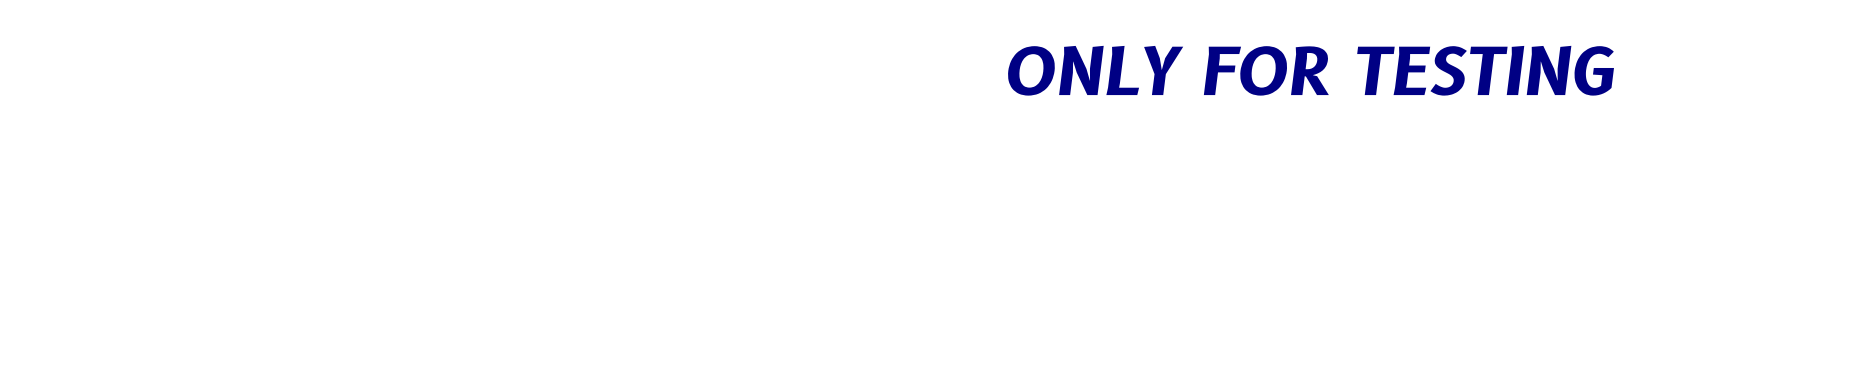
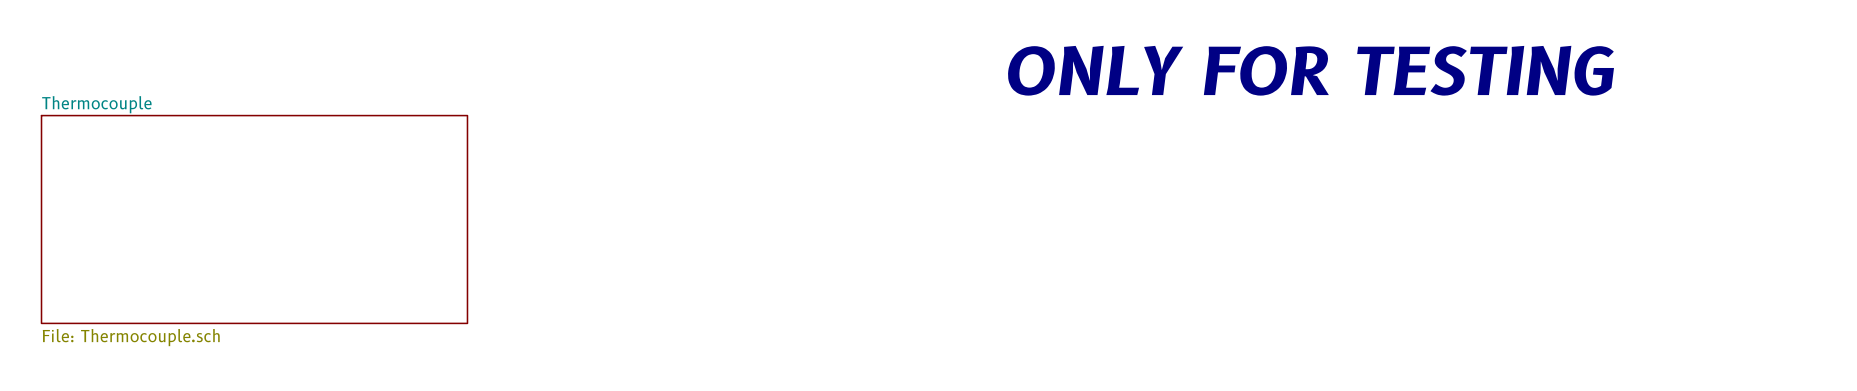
sheet Thermocouple: none -> File: Thermocouple.sch (254, 219)

